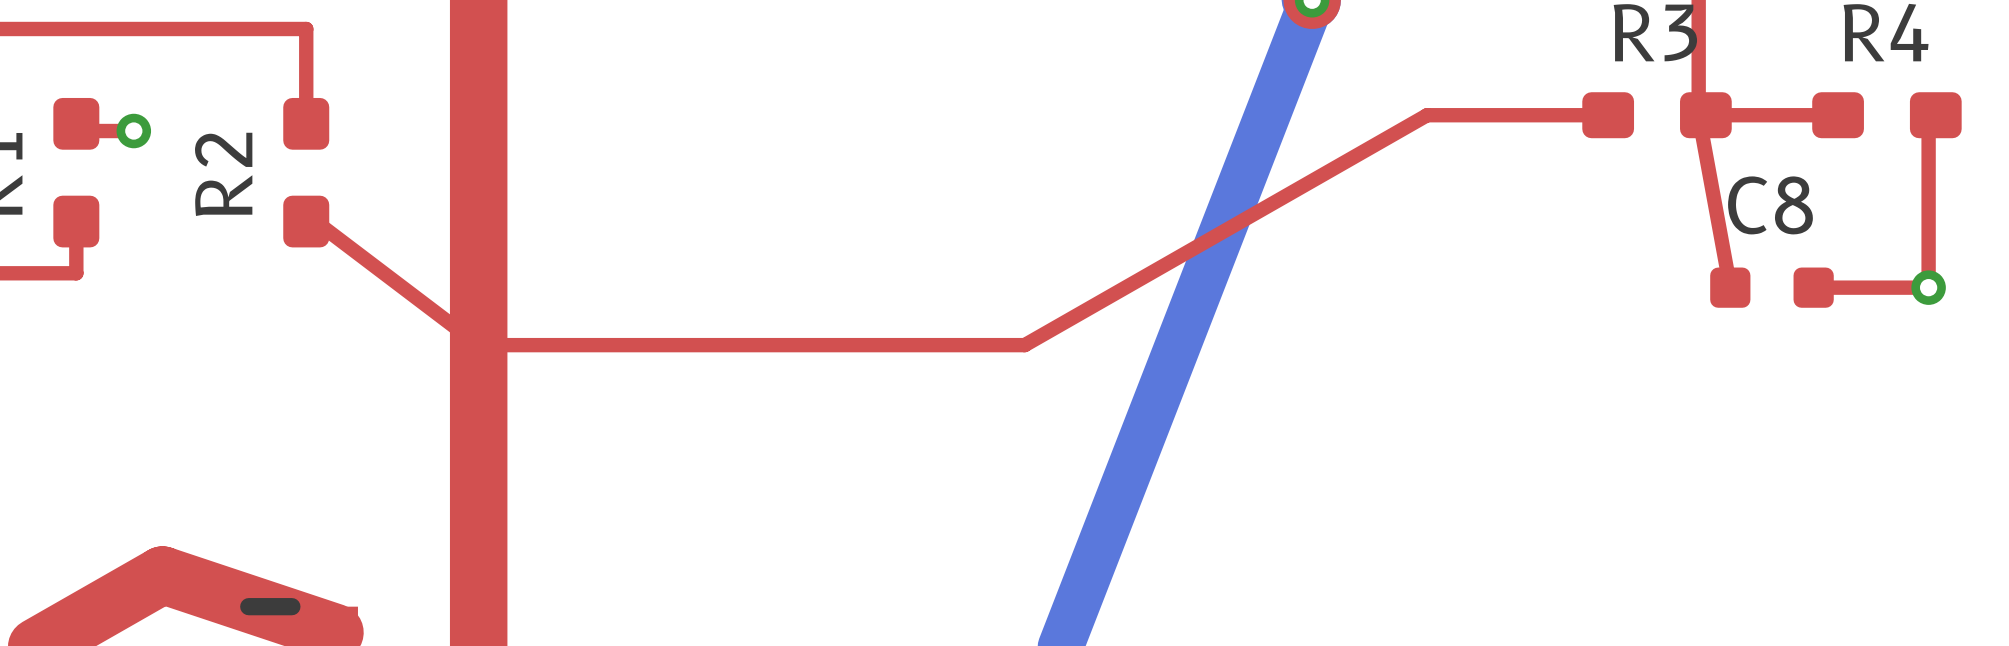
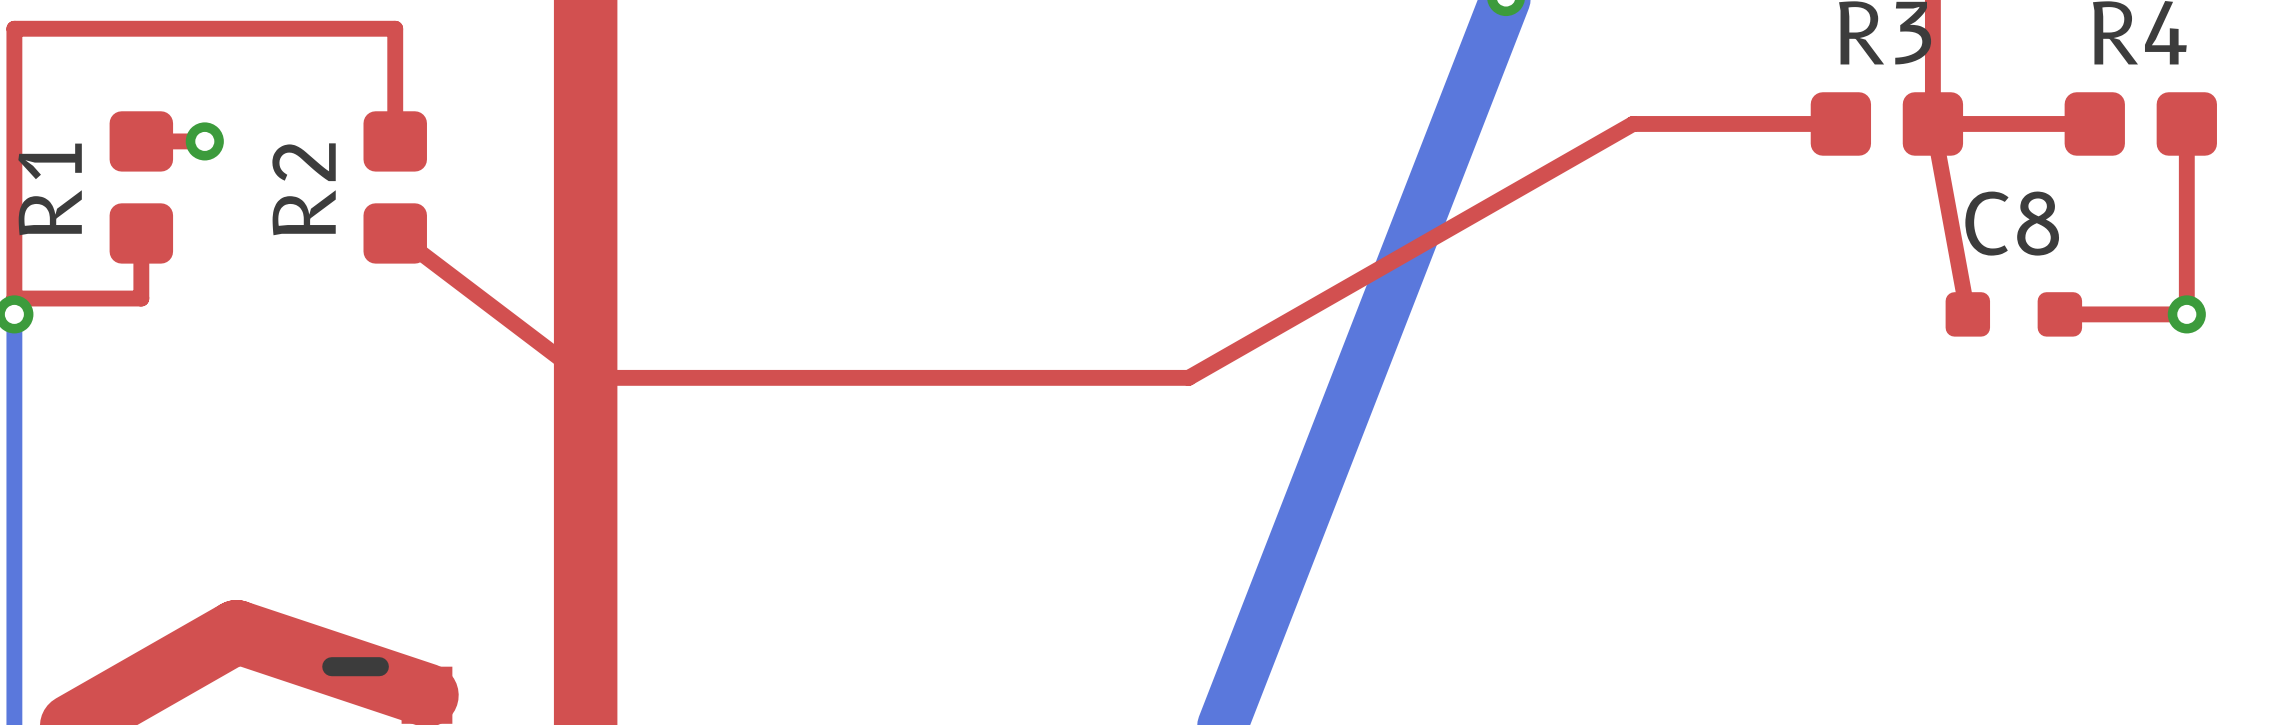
R3 footprint: [1582, 92, 1732, 139] -> [1810, 92, 1964, 156]
R4 footprint: [1812, 92, 1962, 139] -> [2064, 92, 2217, 156]
R1 footprint: [53, 97, 100, 248] -> [109, 111, 174, 264]
R2 footprint: [283, 97, 330, 248] -> [363, 111, 427, 264]

